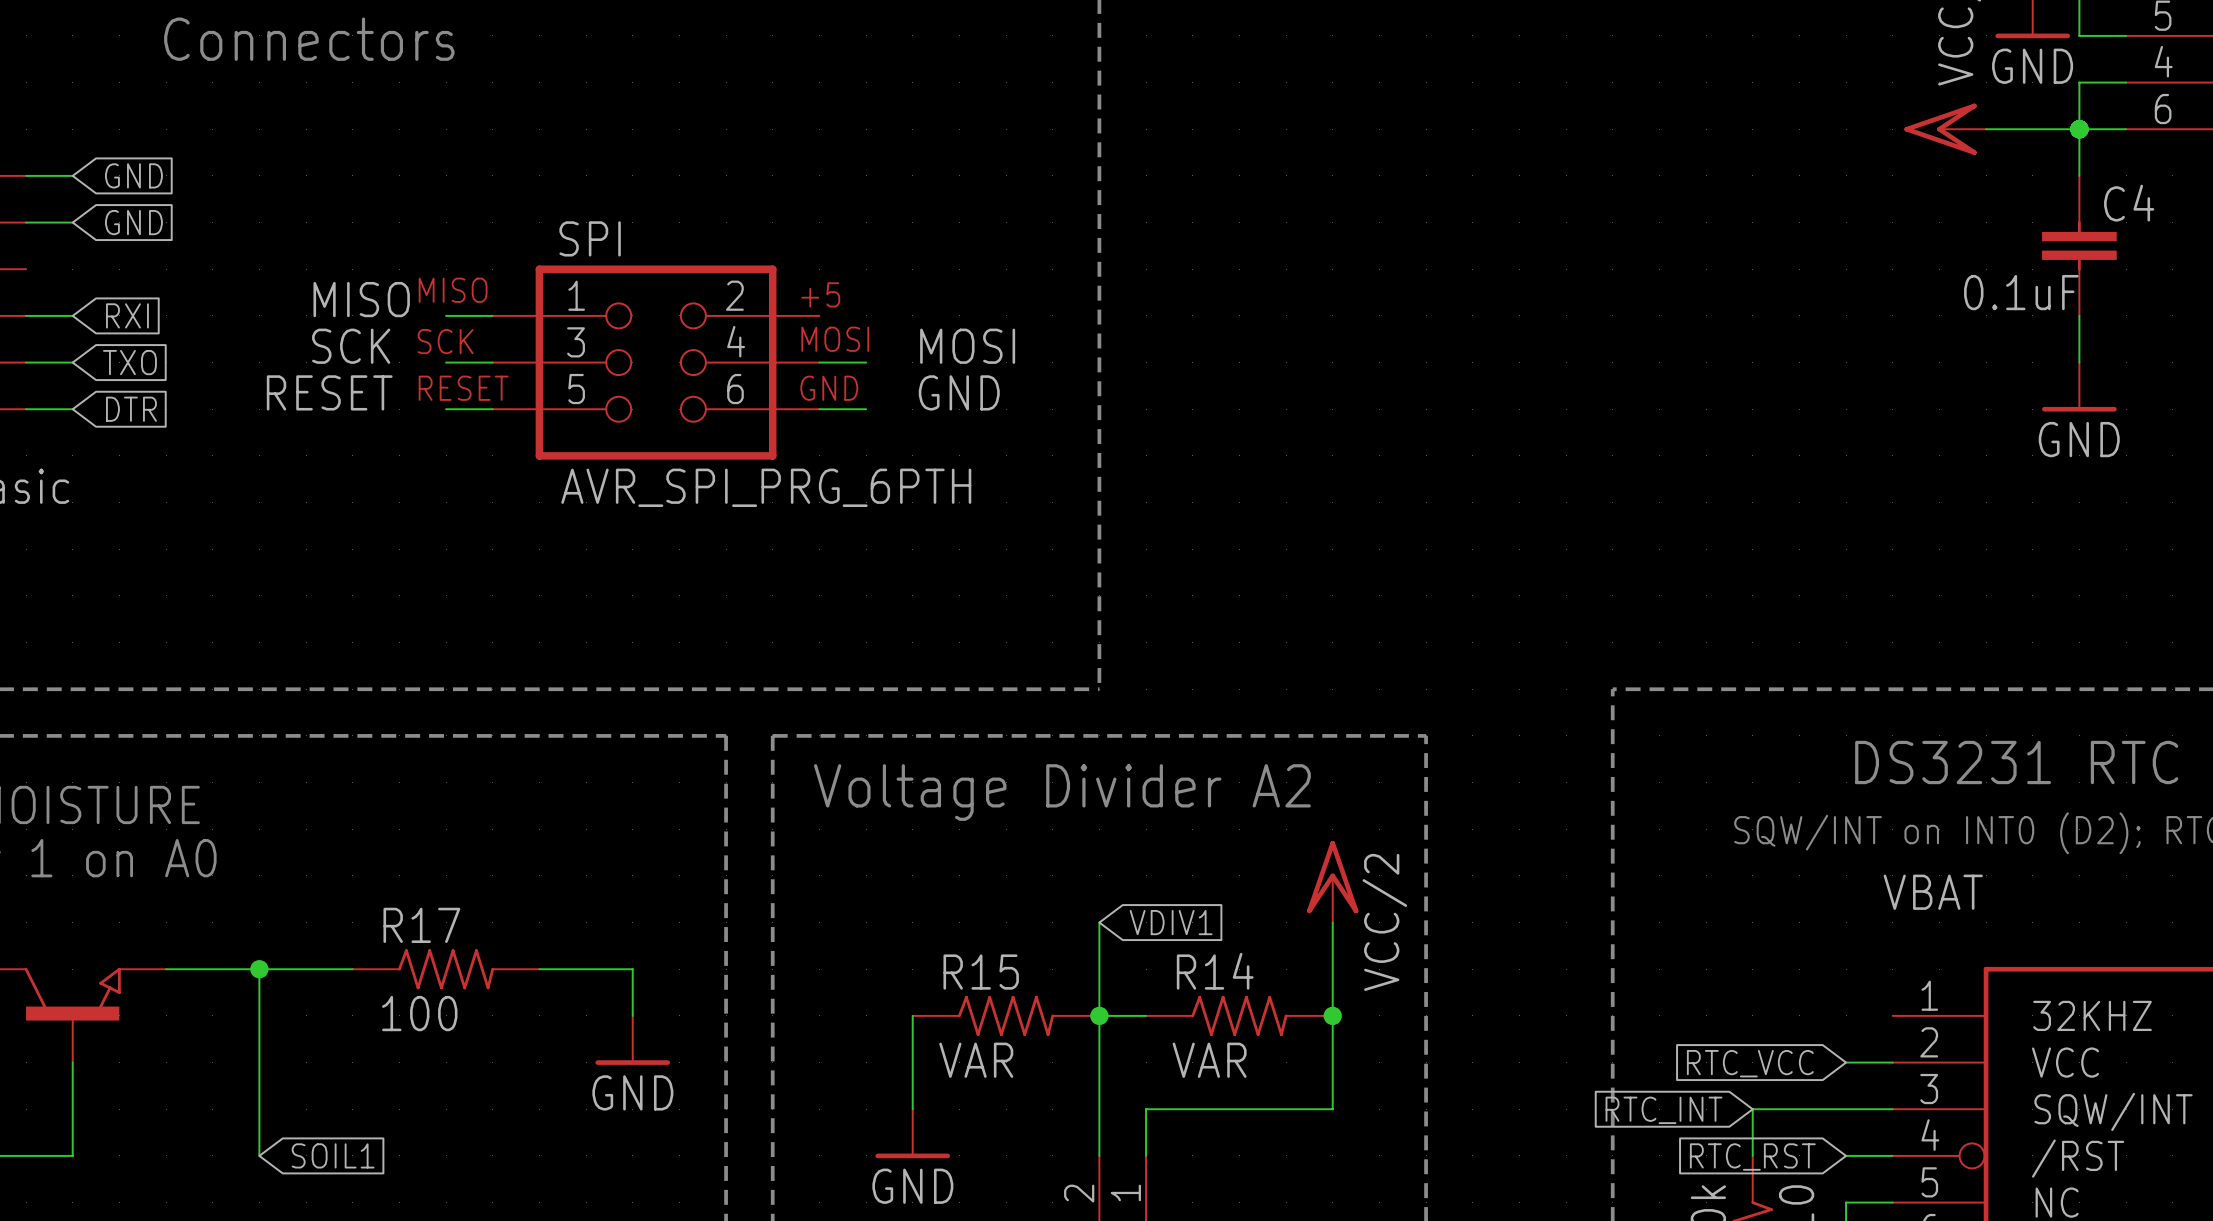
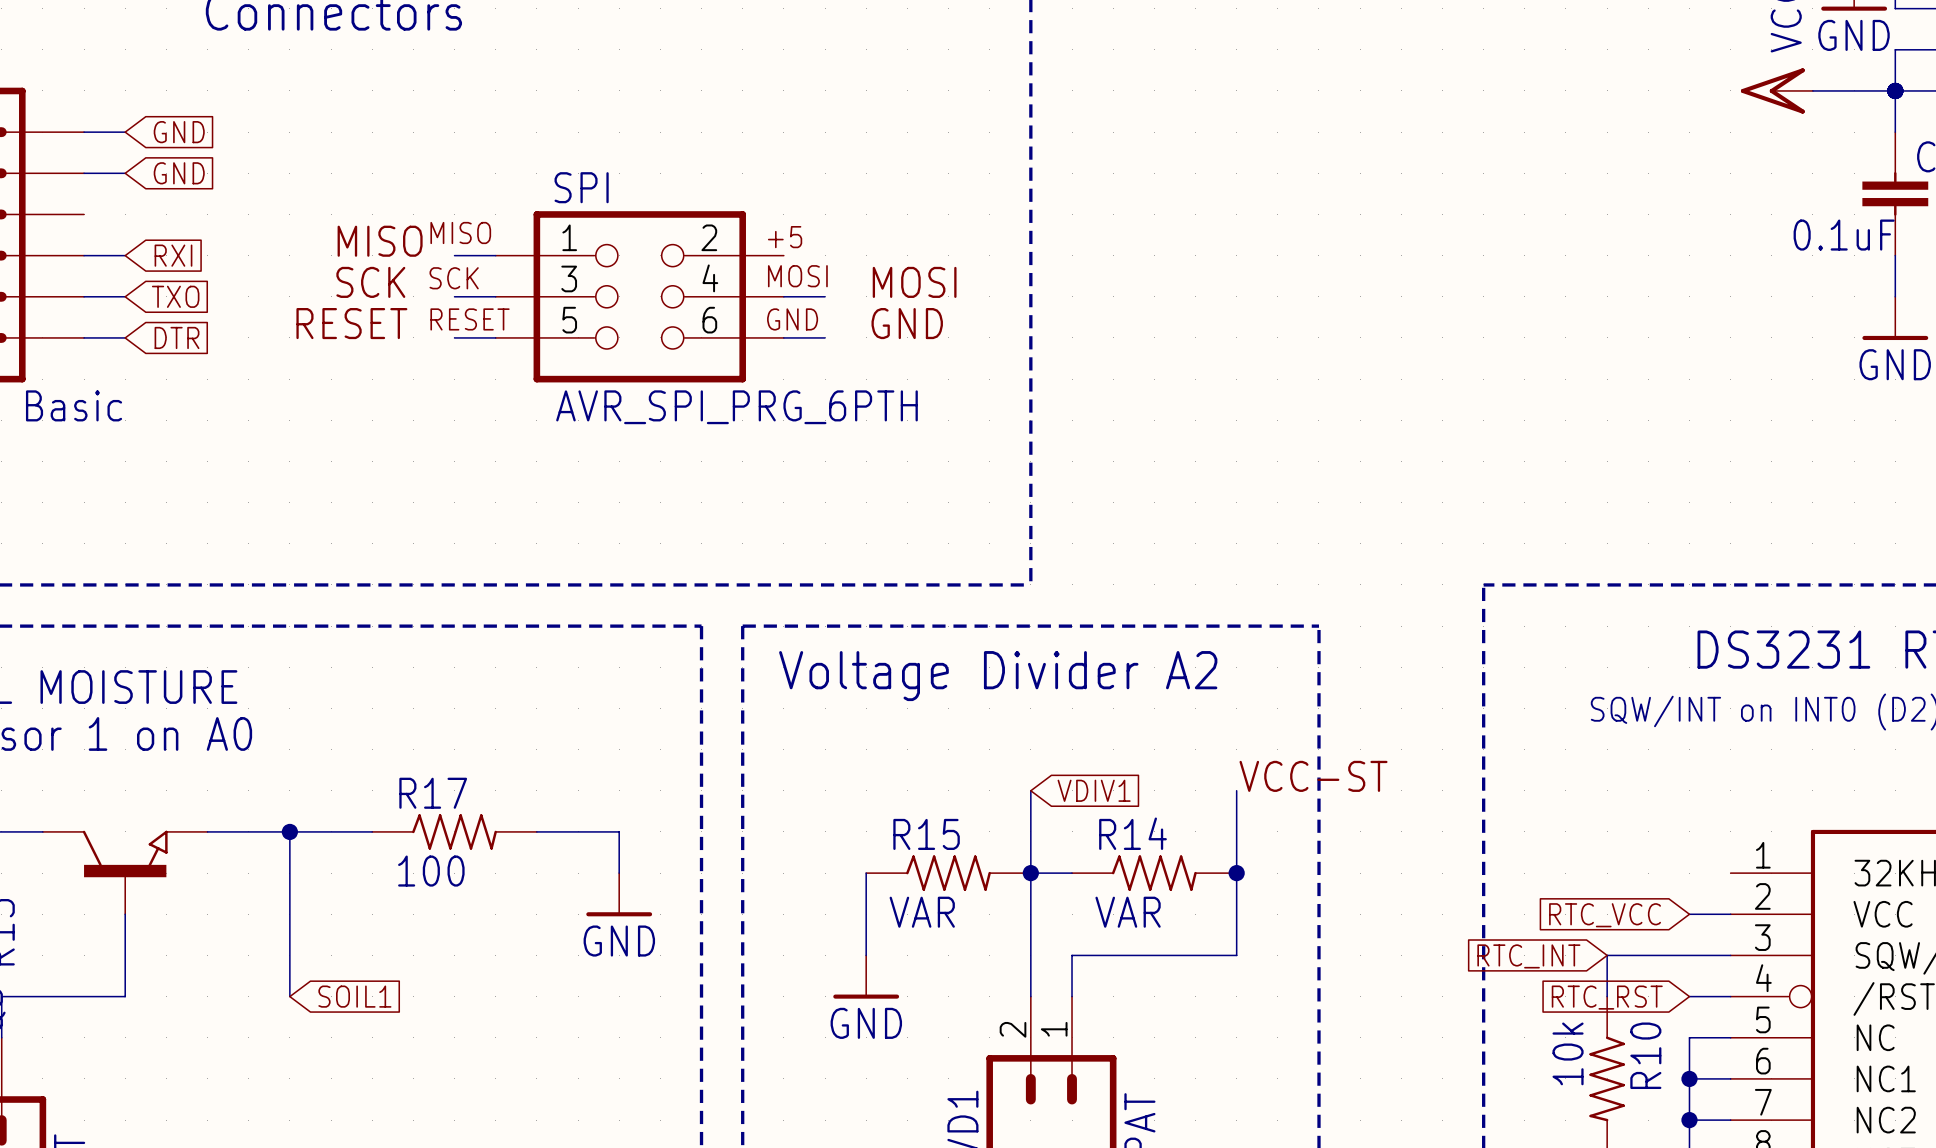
power symbol: VCC/2 (1332, 881) -> none
label: VBAT (1933, 892) -> none
label: none -> VCC-ST (1313, 776)

